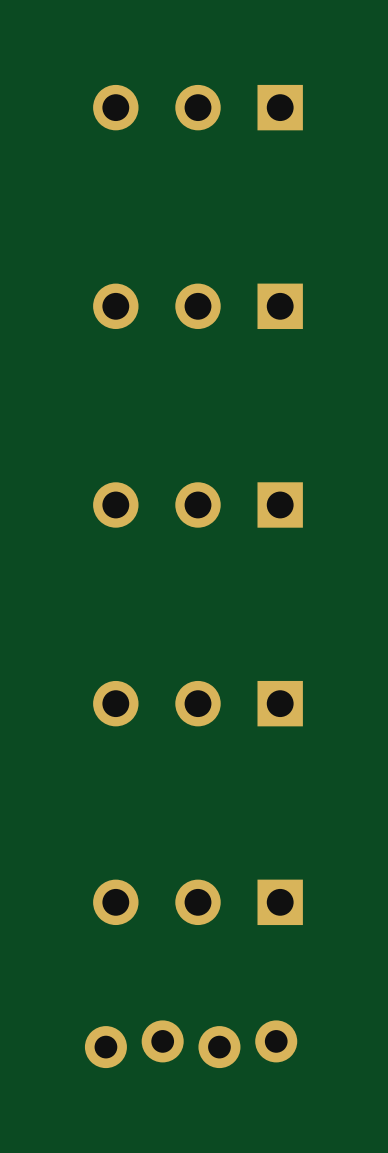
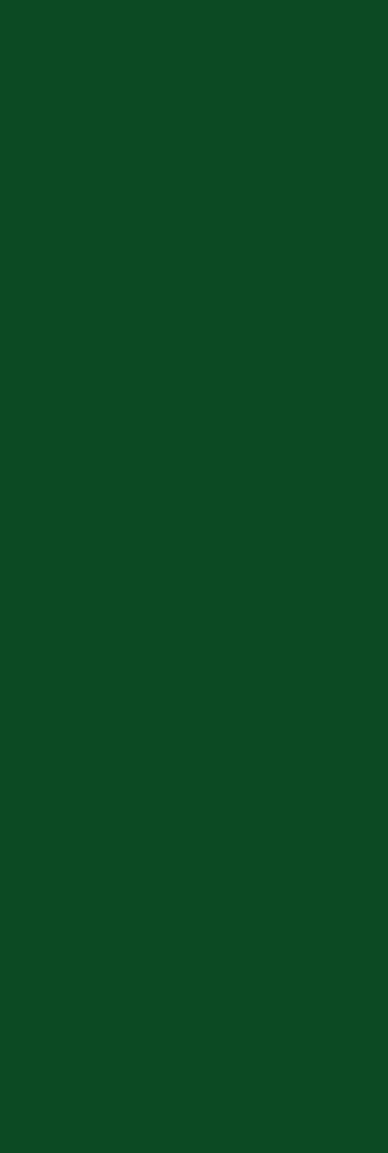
part: (198, 107) -> none
part: (198, 306) -> none
part: (198, 504) -> none
part: (198, 703) -> none
part: (198, 902) -> none
part: (191, 1044) -> none

